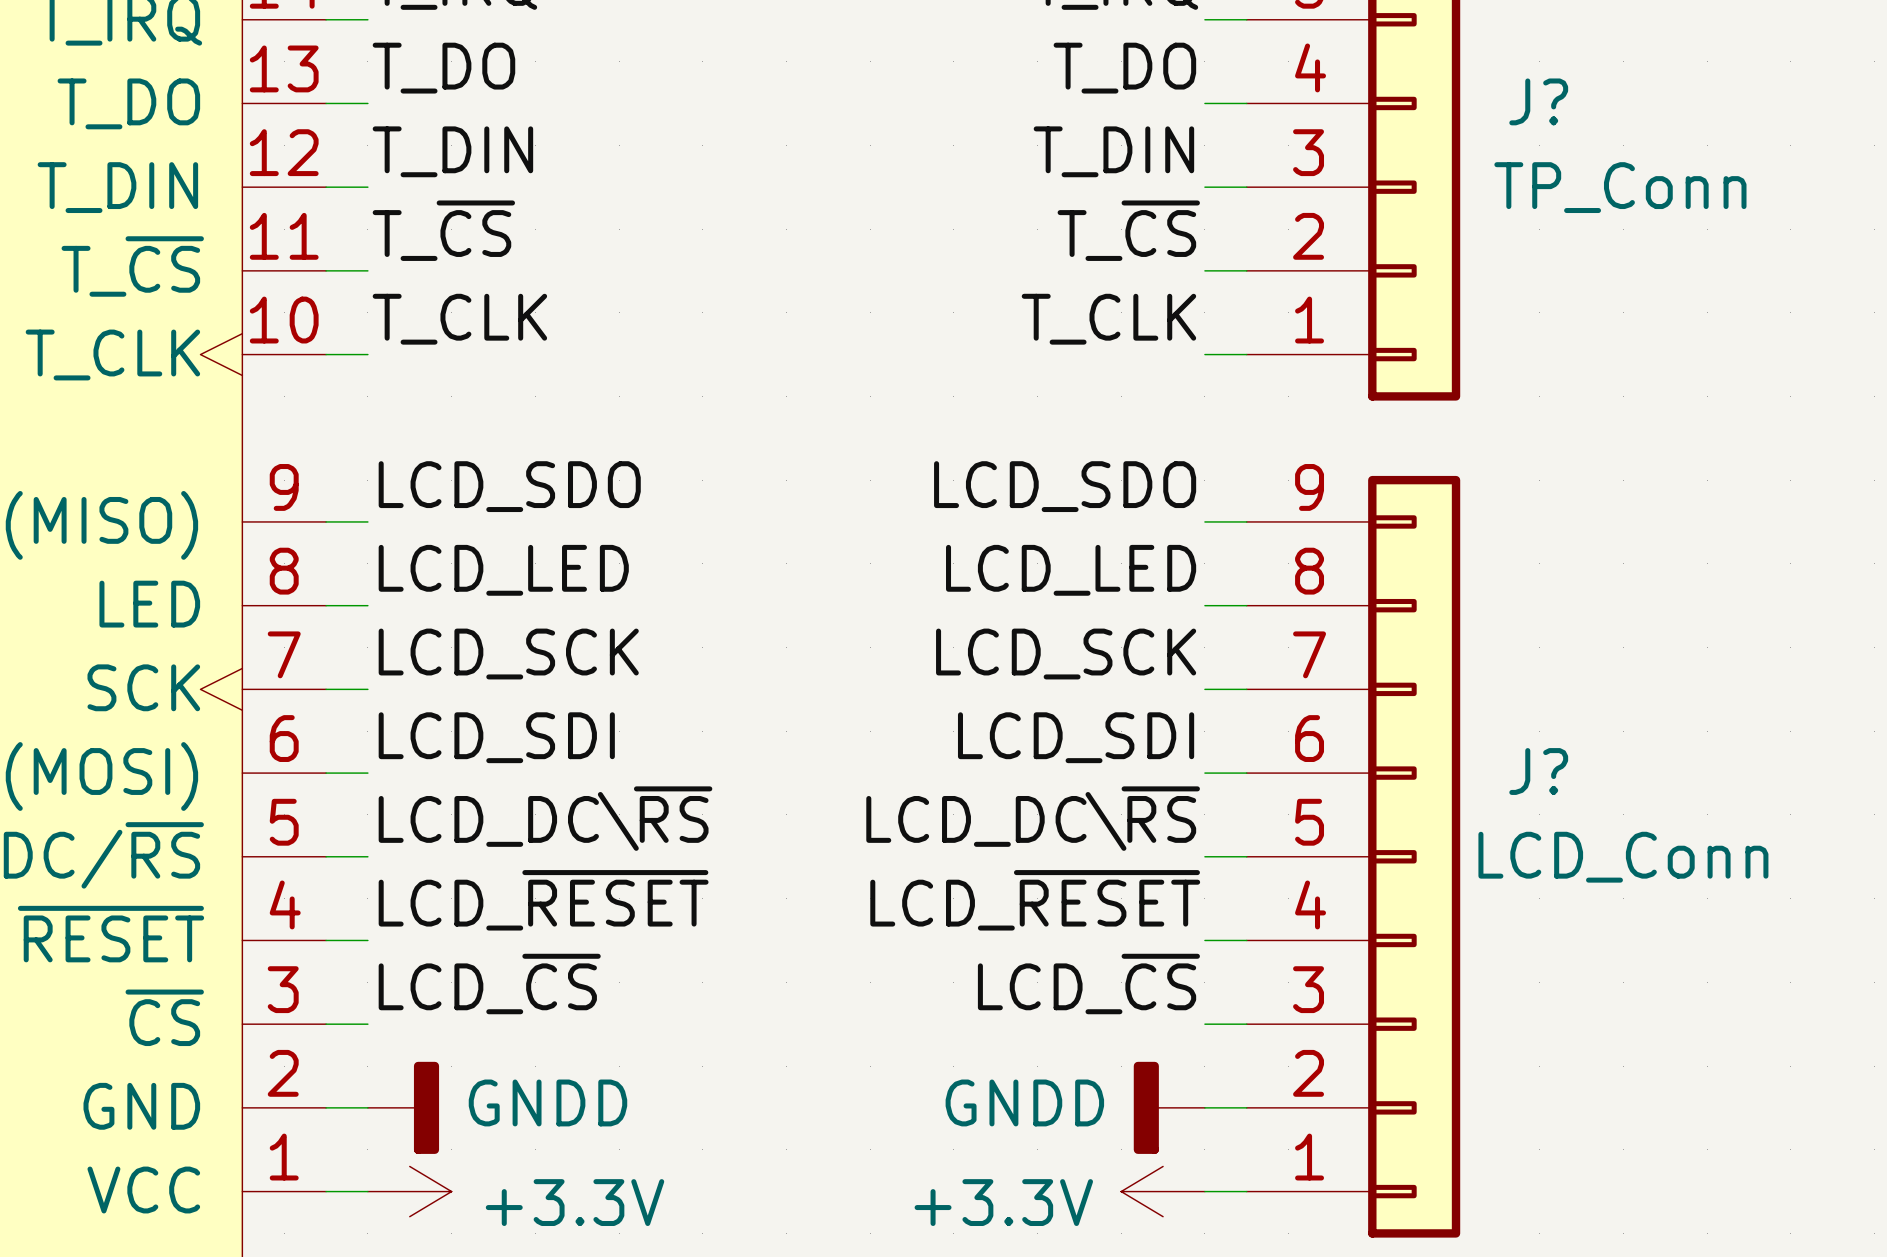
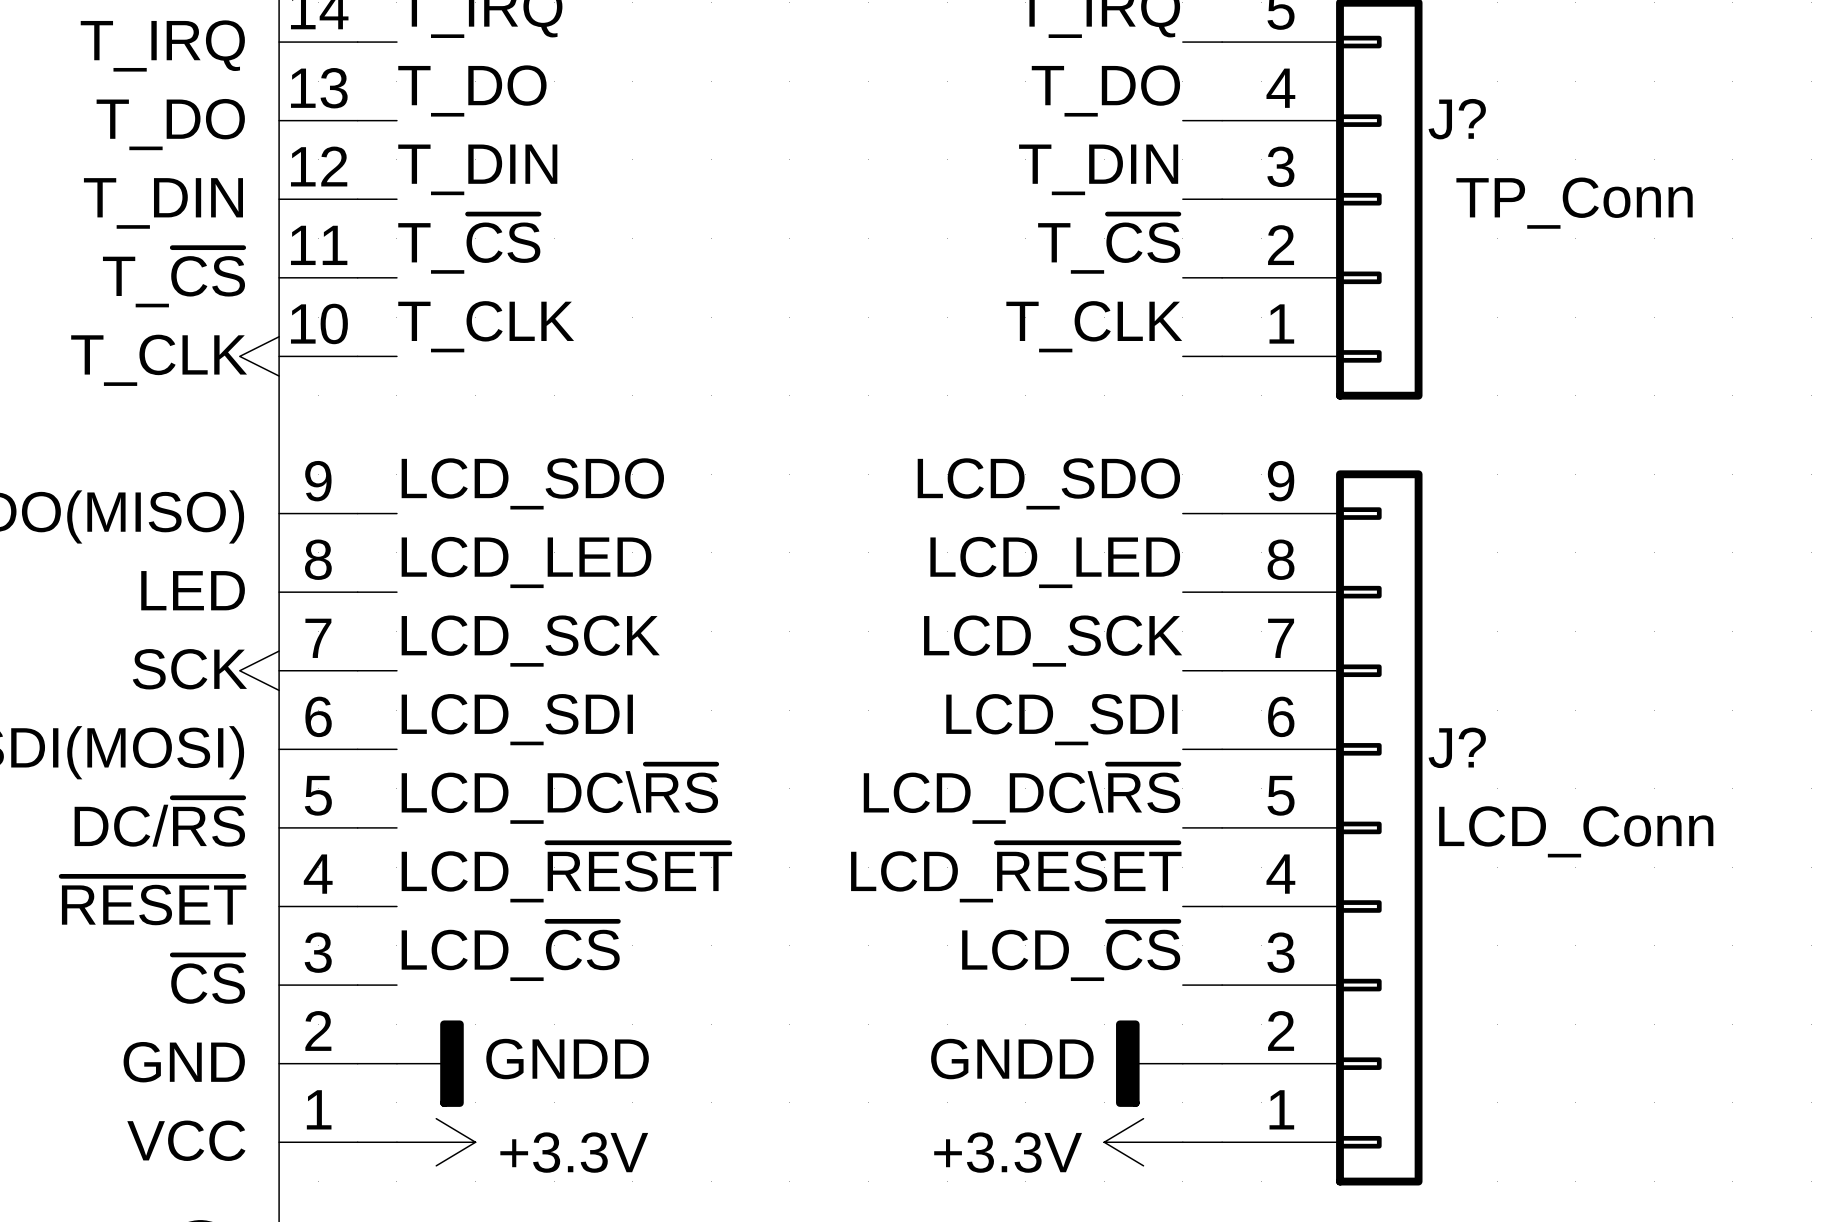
J? name position: J? (1538, 101) -> J? (1457, 119)
J? name position: J? (1538, 771) -> J? (1457, 747)

